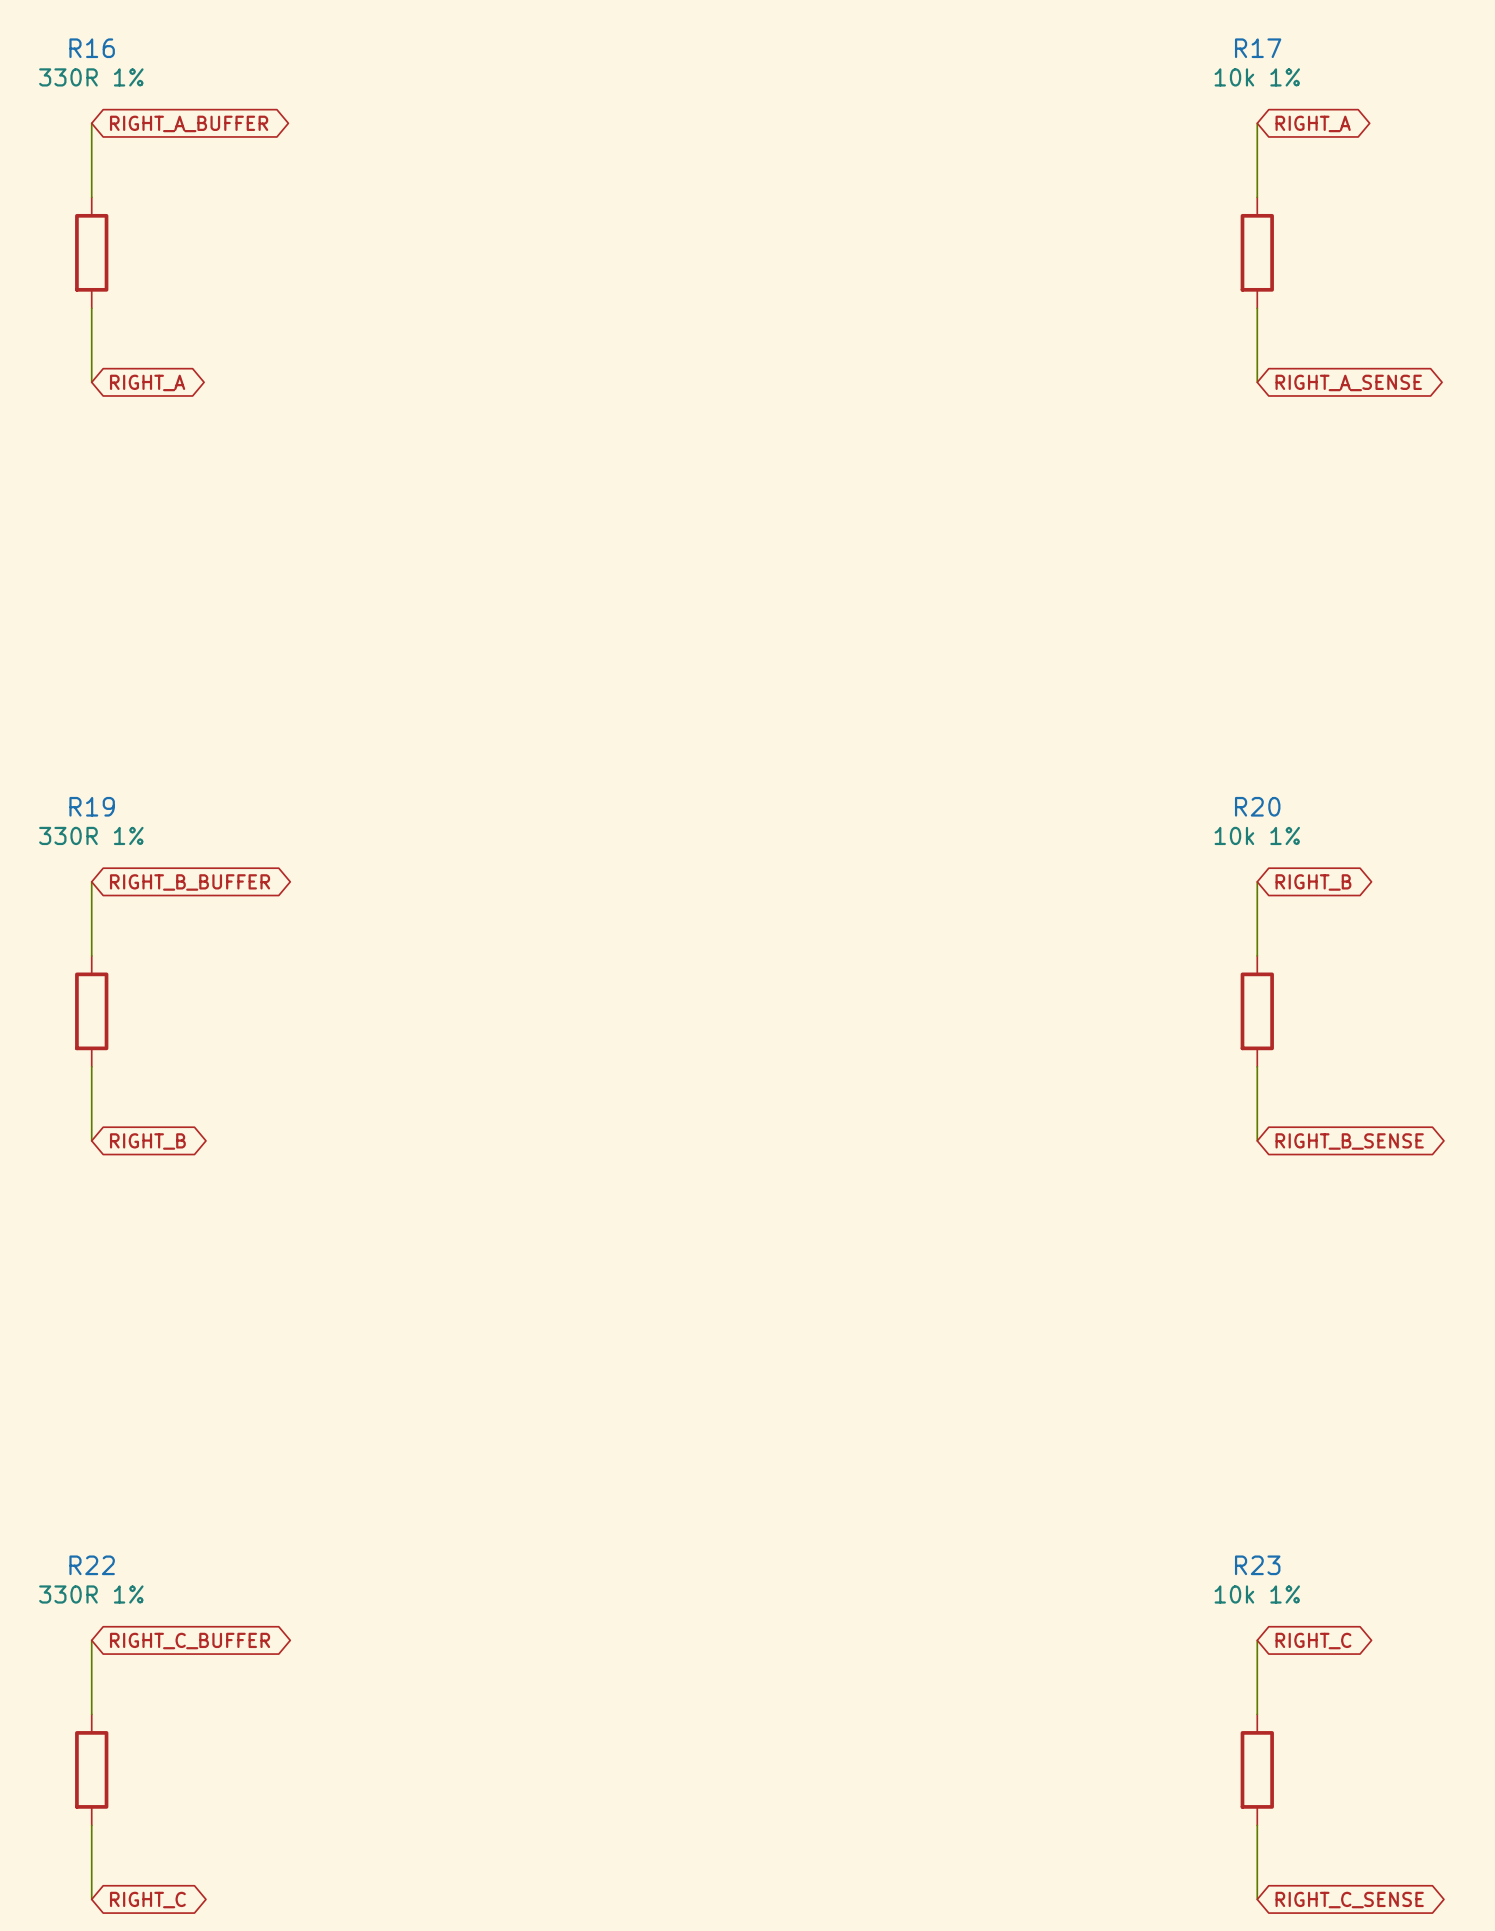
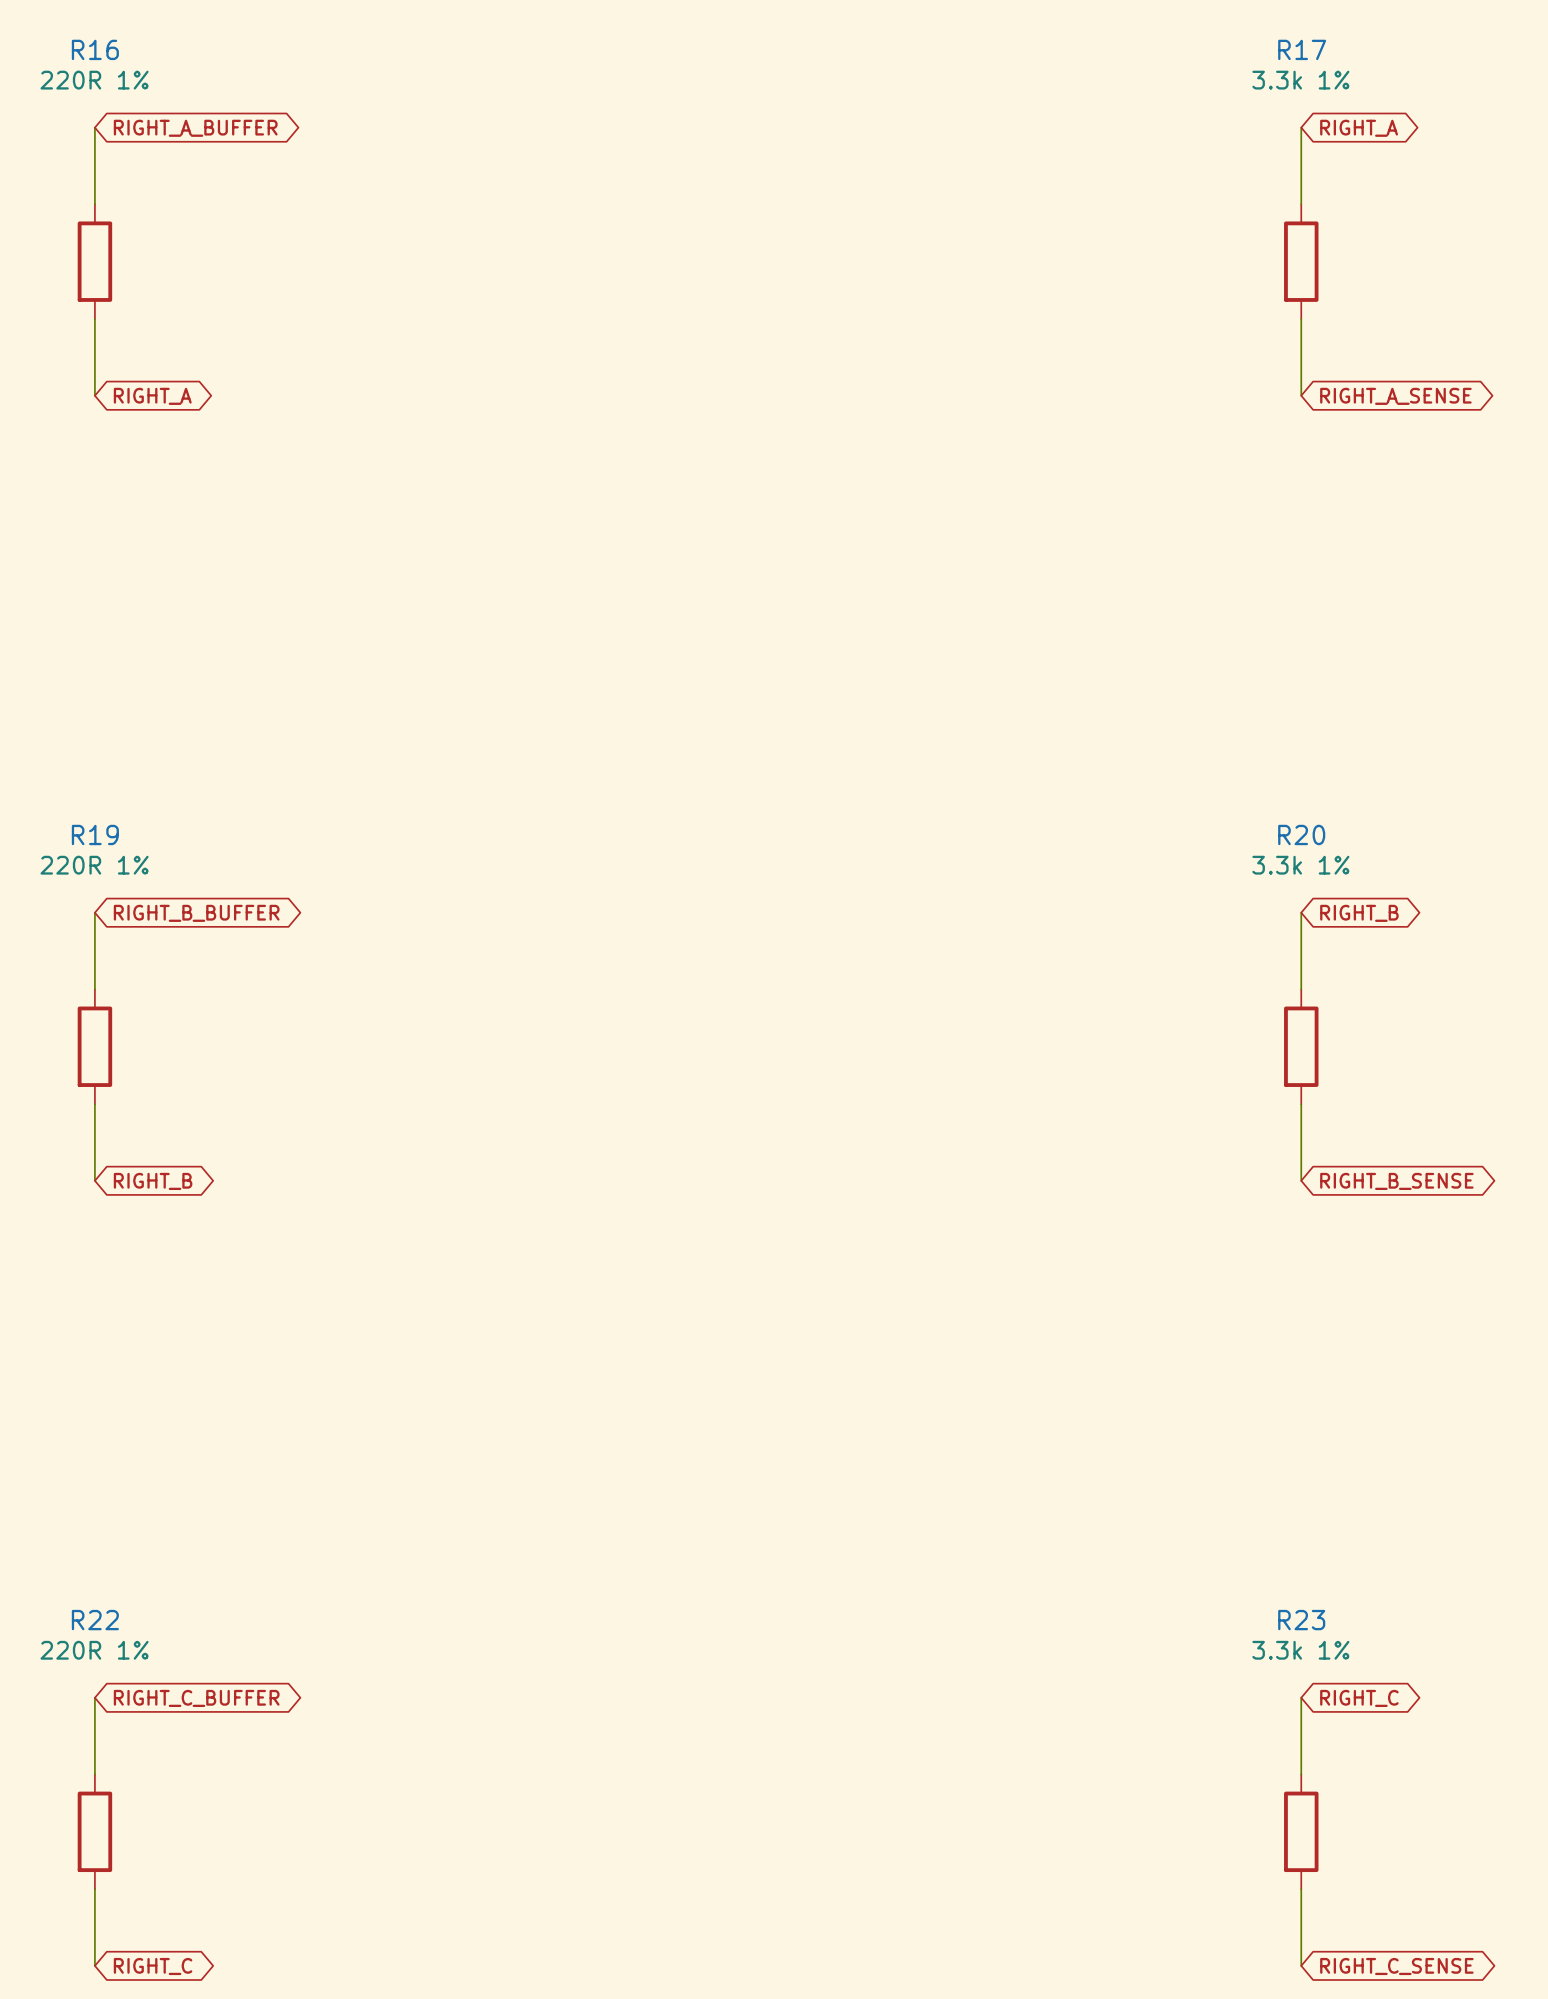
R16 value: 330R 1% (91, 77) -> 220R 1% (94, 80)
R17 value: 10k 1% (1257, 77) -> 3.3k 1% (1300, 80)
R19 value: 330R 1% (91, 835) -> 220R 1% (94, 865)
R20 value: 10k 1% (1257, 835) -> 3.3k 1% (1300, 865)
R22 value: 330R 1% (91, 1594) -> 220R 1% (94, 1650)
R23 value: 10k 1% (1257, 1594) -> 3.3k 1% (1300, 1650)

